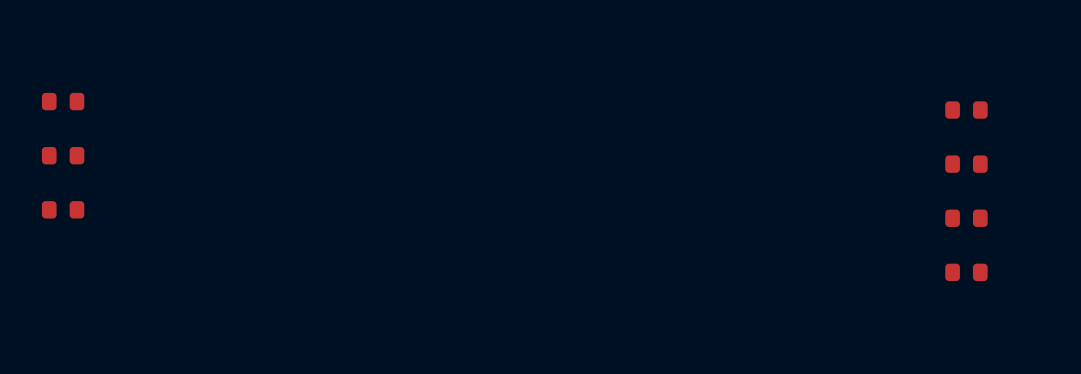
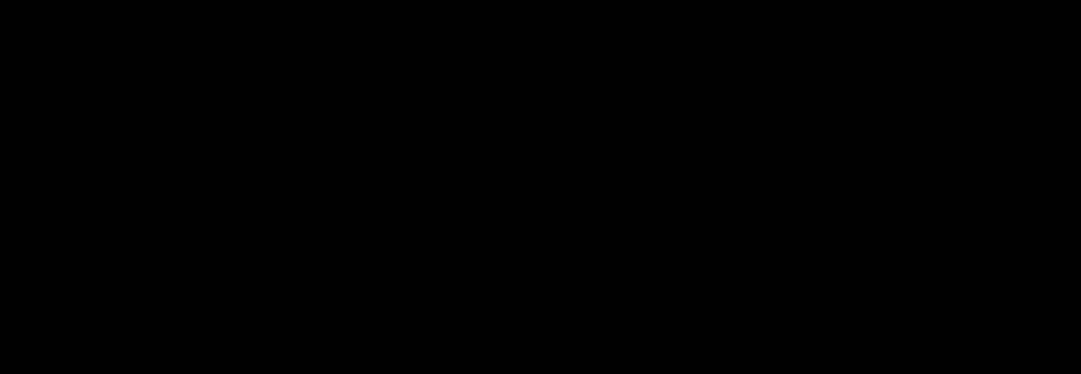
part: (63, 101) -> none
part: (966, 110) -> none
part: (63, 155) -> none
part: (966, 164) -> none
part: (63, 209) -> none
part: (966, 218) -> none
part: (966, 272) -> none

